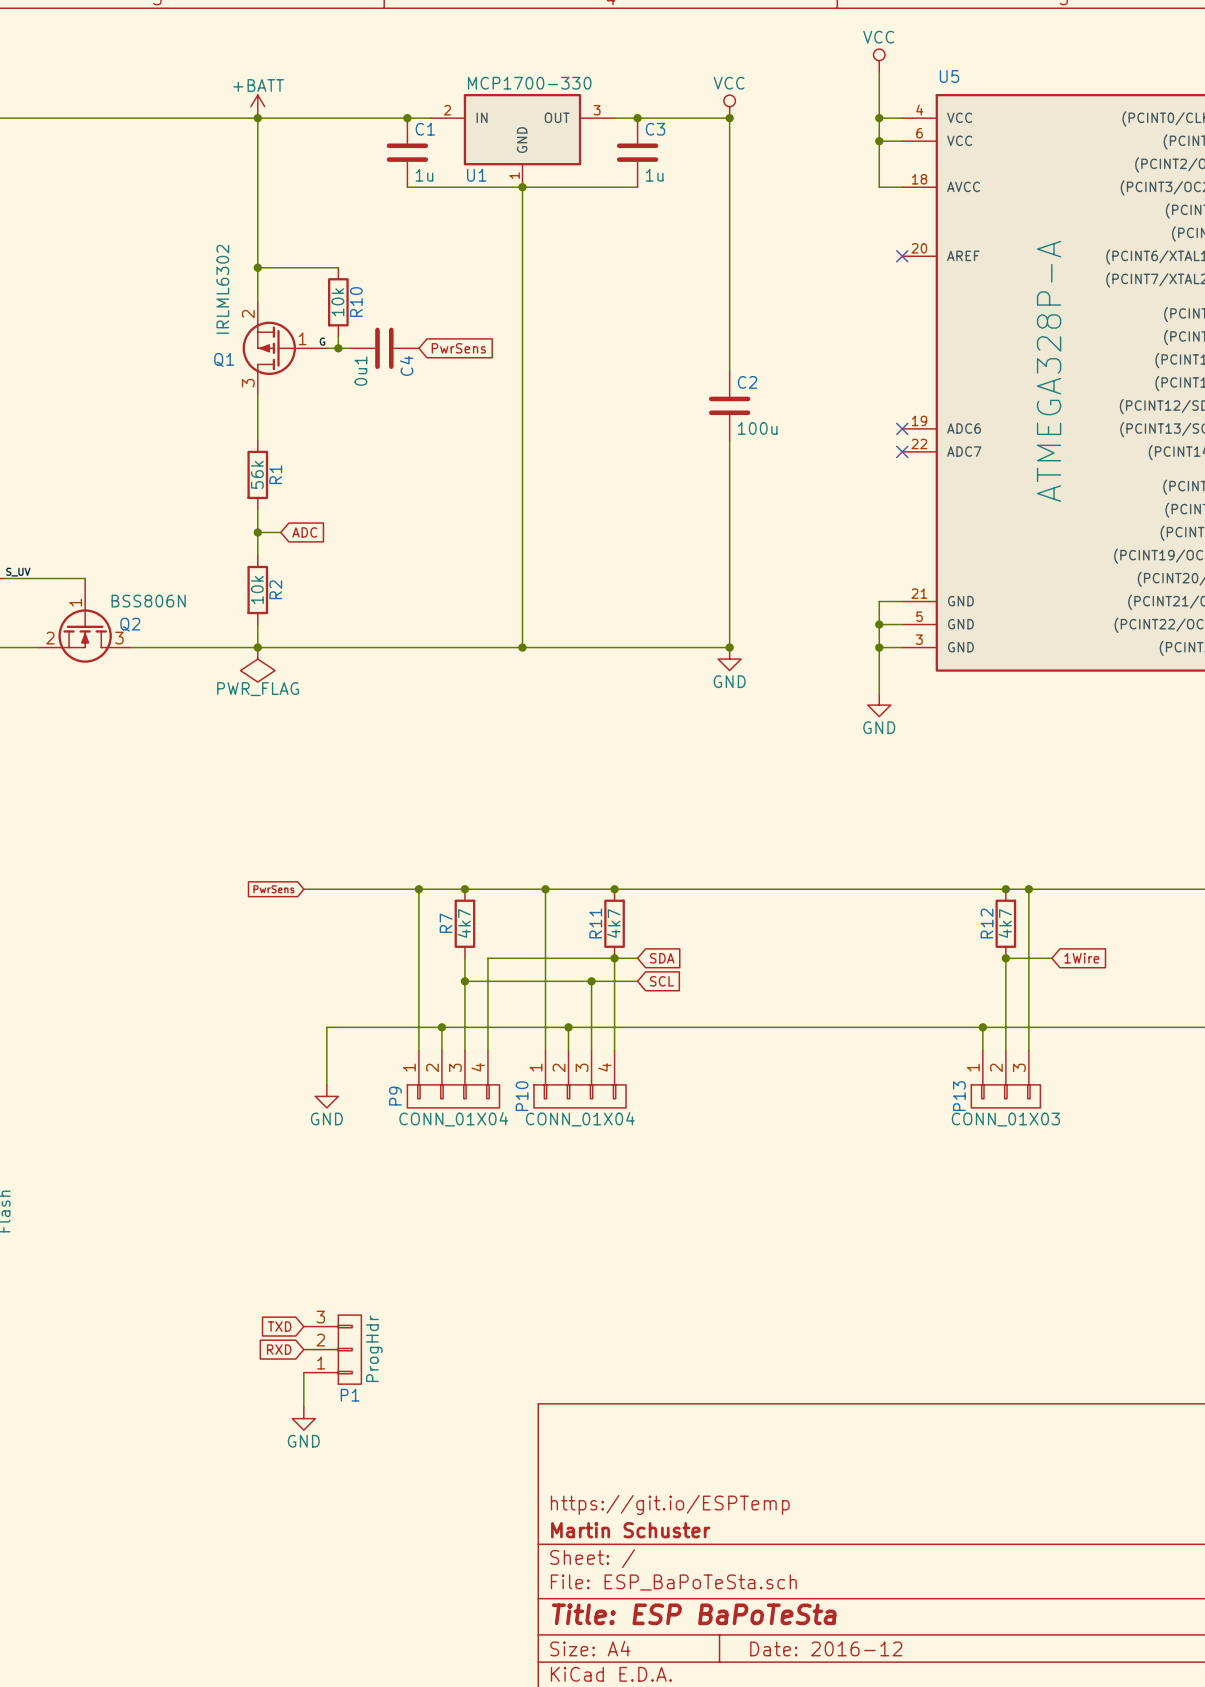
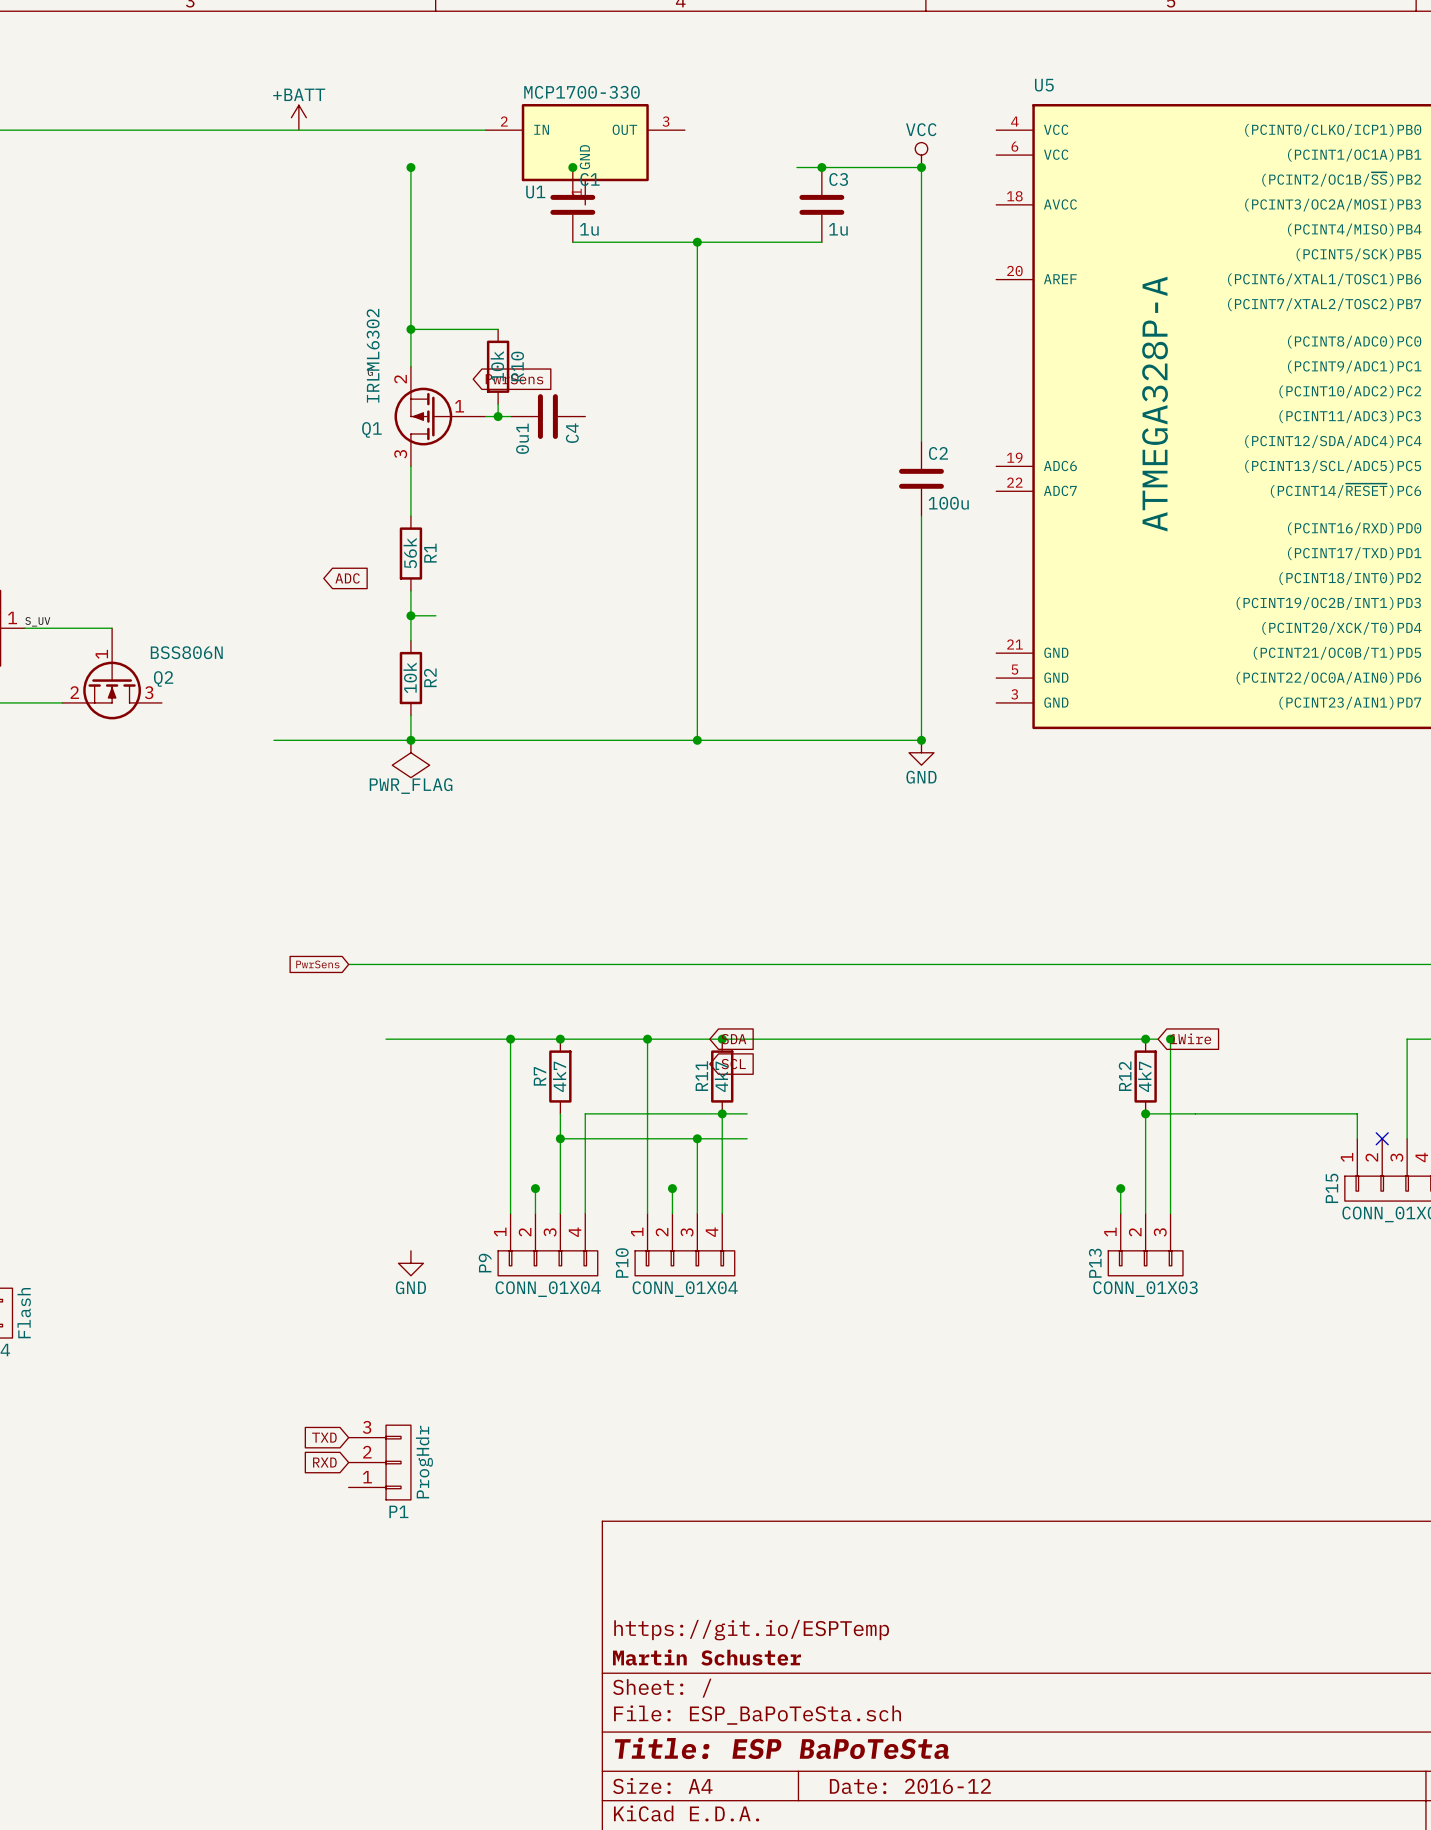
power symbol: VCC (879, 60) -> none
wire: (879, 72) (879, 187) (902, 187) -> none
power symbol: VCC (729, 106) -> none
wire: (257, 118) (257, 302) -> (410, 167) (410, 366)
junction: (257, 118) -> none
junction: (407, 118) -> none
wire: (614, 118) (729, 118) (729, 371) -> (796, 167) (921, 167) (921, 441)
junction: (637, 118) -> none
junction position: (729, 118) -> (821, 167)
wire: (879, 118) (902, 118) -> none
junction: (879, 118) -> none
power symbol: none -> VCC (921, 155)
wire: (879, 141) (902, 141) -> none
junction: (879, 141) -> none
junction: none -> (410, 167)
C1 position: (407, 152) -> (572, 204)
C3 position: (637, 152) -> (821, 204)
junction: none -> (921, 167)
wire: (407, 187) (637, 187) -> (572, 242) (821, 242)
wire: (522, 187) (522, 647) -> (697, 242) (697, 740)
junction position: (522, 187) -> (572, 167)
junction: none -> (697, 242)
no-connect mark: (902, 256) -> none
wire: (257, 267) (338, 267) -> (410, 329) (498, 329)
junction: (257, 267) -> none
R10 position: (338, 302) -> (498, 366)
wire: (338, 336) (338, 348) -> (498, 404) (498, 416)
Q1 position: (284, 348) -> (440, 416)
wire: (326, 348) (349, 348) -> (485, 416) (510, 416)
junction position: (338, 348) -> (410, 329)
C4 position: (384, 348) -> (547, 416)
junction: none -> (498, 416)
wire: (257, 394) (257, 440) -> (410, 466) (410, 516)
C2 position: (729, 405) -> (921, 478)
no-connect mark: (902, 428) -> none
wire: (729, 440) (729, 647) (131, 647) -> (921, 516) (921, 740) (273, 740)
no-connect mark: (902, 451) -> none
R1 position: (257, 474) -> (410, 553)
wire: (257, 509) (257, 555) -> (410, 590) (410, 640)
wire: (257, 532) (280, 532) -> (410, 615) (435, 615)
junction: (257, 532) -> none
junction: none -> (410, 615)
R2 position: (257, 590) -> (410, 678)
wire: (902, 601) (879, 601) (879, 693) -> none
wire: (257, 624) (257, 647) -> (410, 715) (410, 740)
wire: (879, 624) (902, 624) -> none
junction: (879, 624) -> none
junction: (257, 647) -> none
junction: (522, 647) -> none
junction: (729, 647) -> none
wire: (879, 647) (902, 647) -> none
junction: (879, 647) -> none
power symbol: GND (729, 659) -> none
power symbol position: PWR_FLAG (257, 664) -> PWR_FLAG (410, 758)
junction: none -> (410, 740)
junction: none -> (697, 740)
junction: none -> (921, 740)
power symbol position: GND (879, 705) -> GND (921, 752)
wire: (418, 889) (418, 1050) -> (510, 1039) (510, 1213)
junction: (418, 889) -> none
junction: (464, 889) -> none
wire: (545, 889) (545, 1050) -> (647, 1039) (647, 1213)
junction: (545, 889) -> none
junction: (614, 889) -> none
junction: (1005, 889) -> none
wire: (1028, 889) (1028, 1050) -> (1170, 1039) (1170, 1213)
junction: (1028, 889) -> none
R7 position: (464, 923) -> (560, 1076)
R11 position: (614, 923) -> (722, 1076)
R12 position: (1005, 923) -> (1145, 1076)
junction: none -> (510, 1039)
wire: (464, 958) (464, 1050) -> (560, 1113) (560, 1213)
wire: (487, 958) (487, 1050) -> (547, 1039) (386, 1039)
junction: none -> (560, 1039)
junction: none -> (647, 1039)
wire: (614, 958) (614, 1050) -> (722, 1113) (722, 1213)
junction: (614, 958) -> none
junction: none -> (722, 1039)
wire: (1005, 958) (1005, 1050) -> (1108, 1039) (709, 1039)
junction: (1005, 958) -> none
junction: none -> (1145, 1039)
junction: none -> (1170, 1039)
wire: (464, 981) (637, 981) -> (560, 1138) (747, 1138)
junction: (464, 981) -> none
wire: (591, 981) (591, 1050) -> (697, 1138) (697, 1213)
junction: (591, 981) -> none
wire: (441, 1027) (441, 1050) -> (535, 1188) (535, 1213)
junction: (441, 1027) -> none
wire: (522, 1027) (326, 1027) (326, 1084) -> (585, 1113) (585, 1213)
wire: (568, 1027) (568, 1050) -> (672, 1188) (672, 1213)
junction: (568, 1027) -> none
junction: none -> (722, 1113)
wire: (672, 1027) (1040, 1027) -> (1145, 1213) (1145, 1113)
wire: (982, 1027) (982, 1050) -> (1120, 1188) (1120, 1213)
junction: (982, 1027) -> none
junction: none -> (1145, 1113)
junction: none -> (560, 1138)
junction: none -> (697, 1138)
P9 position: (453, 1079) -> (547, 1244)
P10 position: (580, 1079) -> (684, 1244)
P13 position: (1005, 1079) -> (1145, 1244)
power symbol position: GND (326, 1096) -> GND (410, 1263)
junction: none -> (535, 1188)
junction: none -> (672, 1188)
junction: none -> (1120, 1188)
wire: (303, 1372) (303, 1407) -> none
power symbol: GND (303, 1418) -> none

